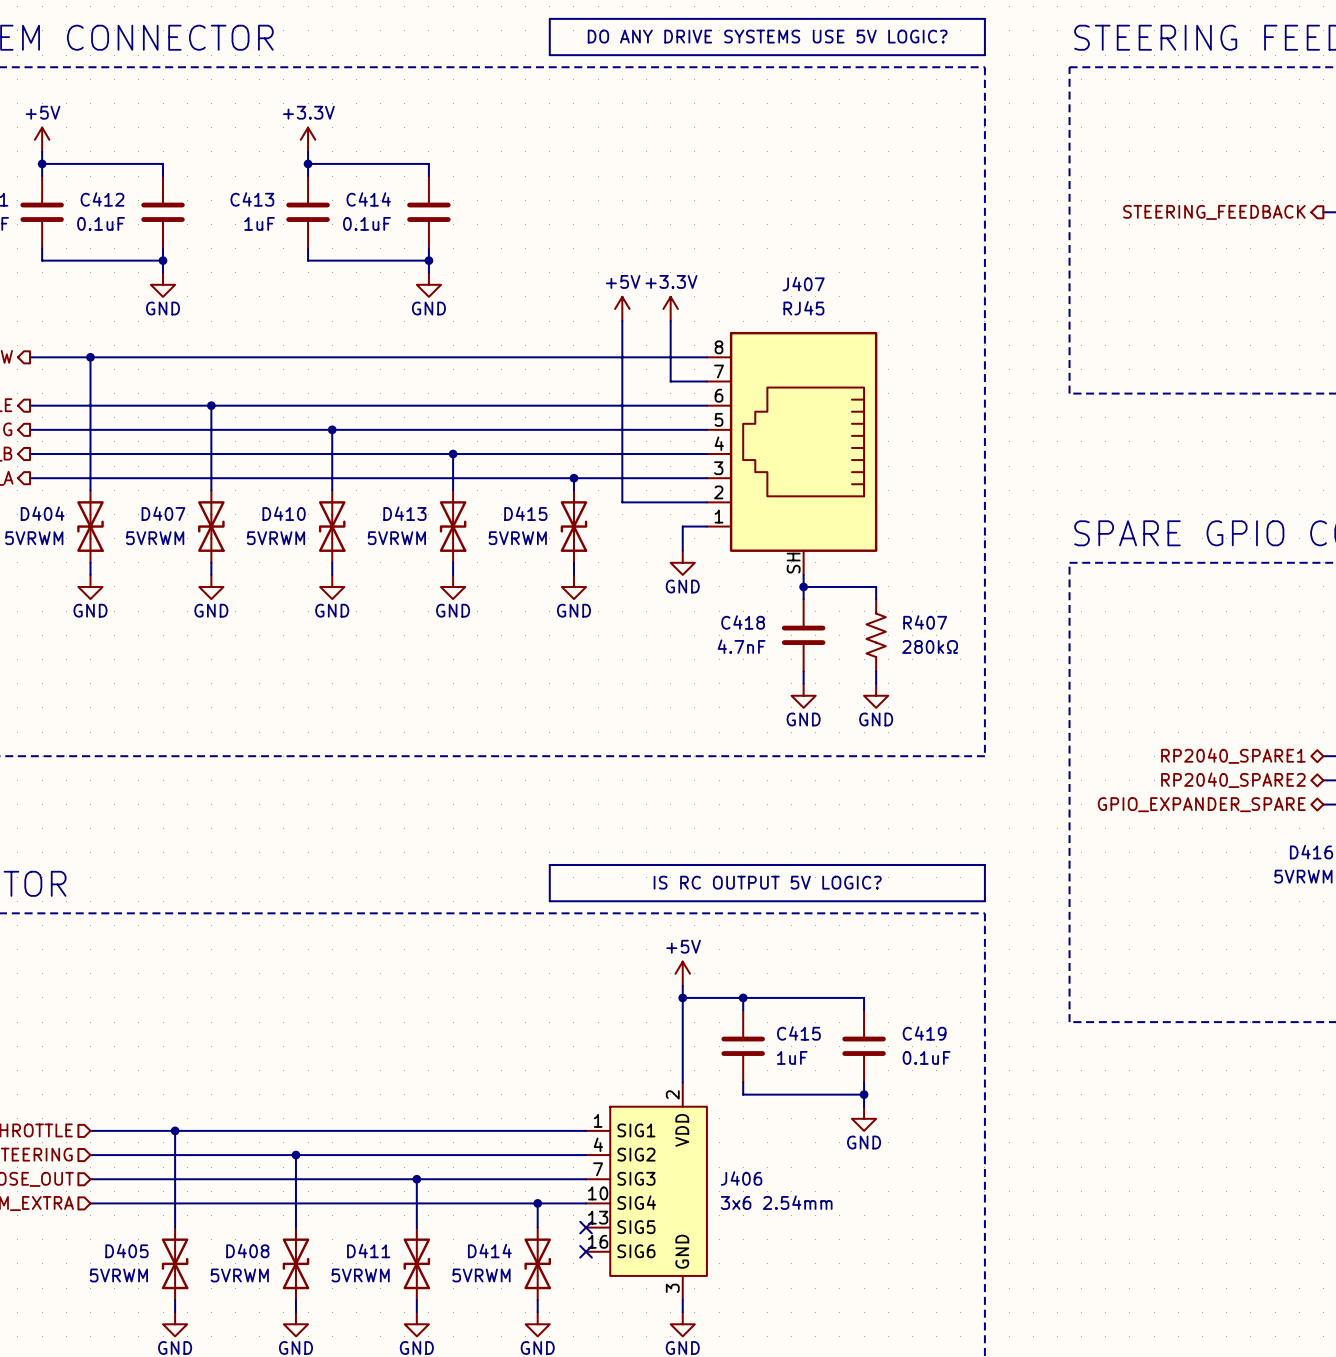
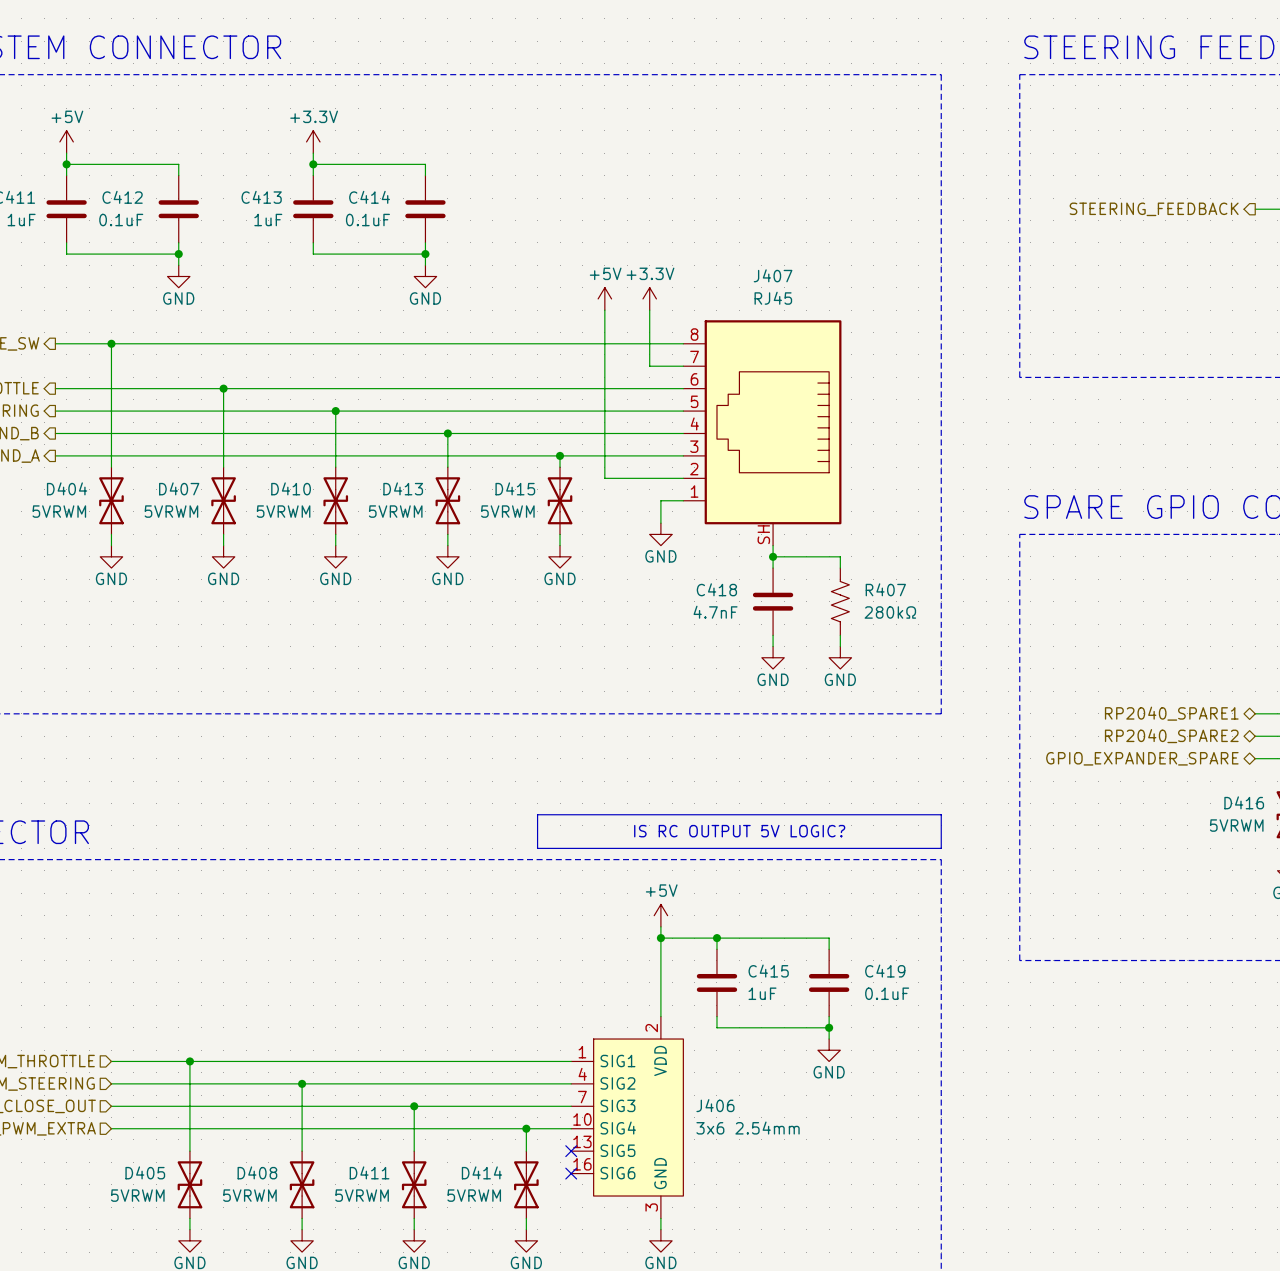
line: (549, 18) (984, 18) (984, 55) (549, 55) (549, 18) -> none
text: DO ANY DRIVE SYSTEMS USE 5V LOGIC? (767, 36) -> none

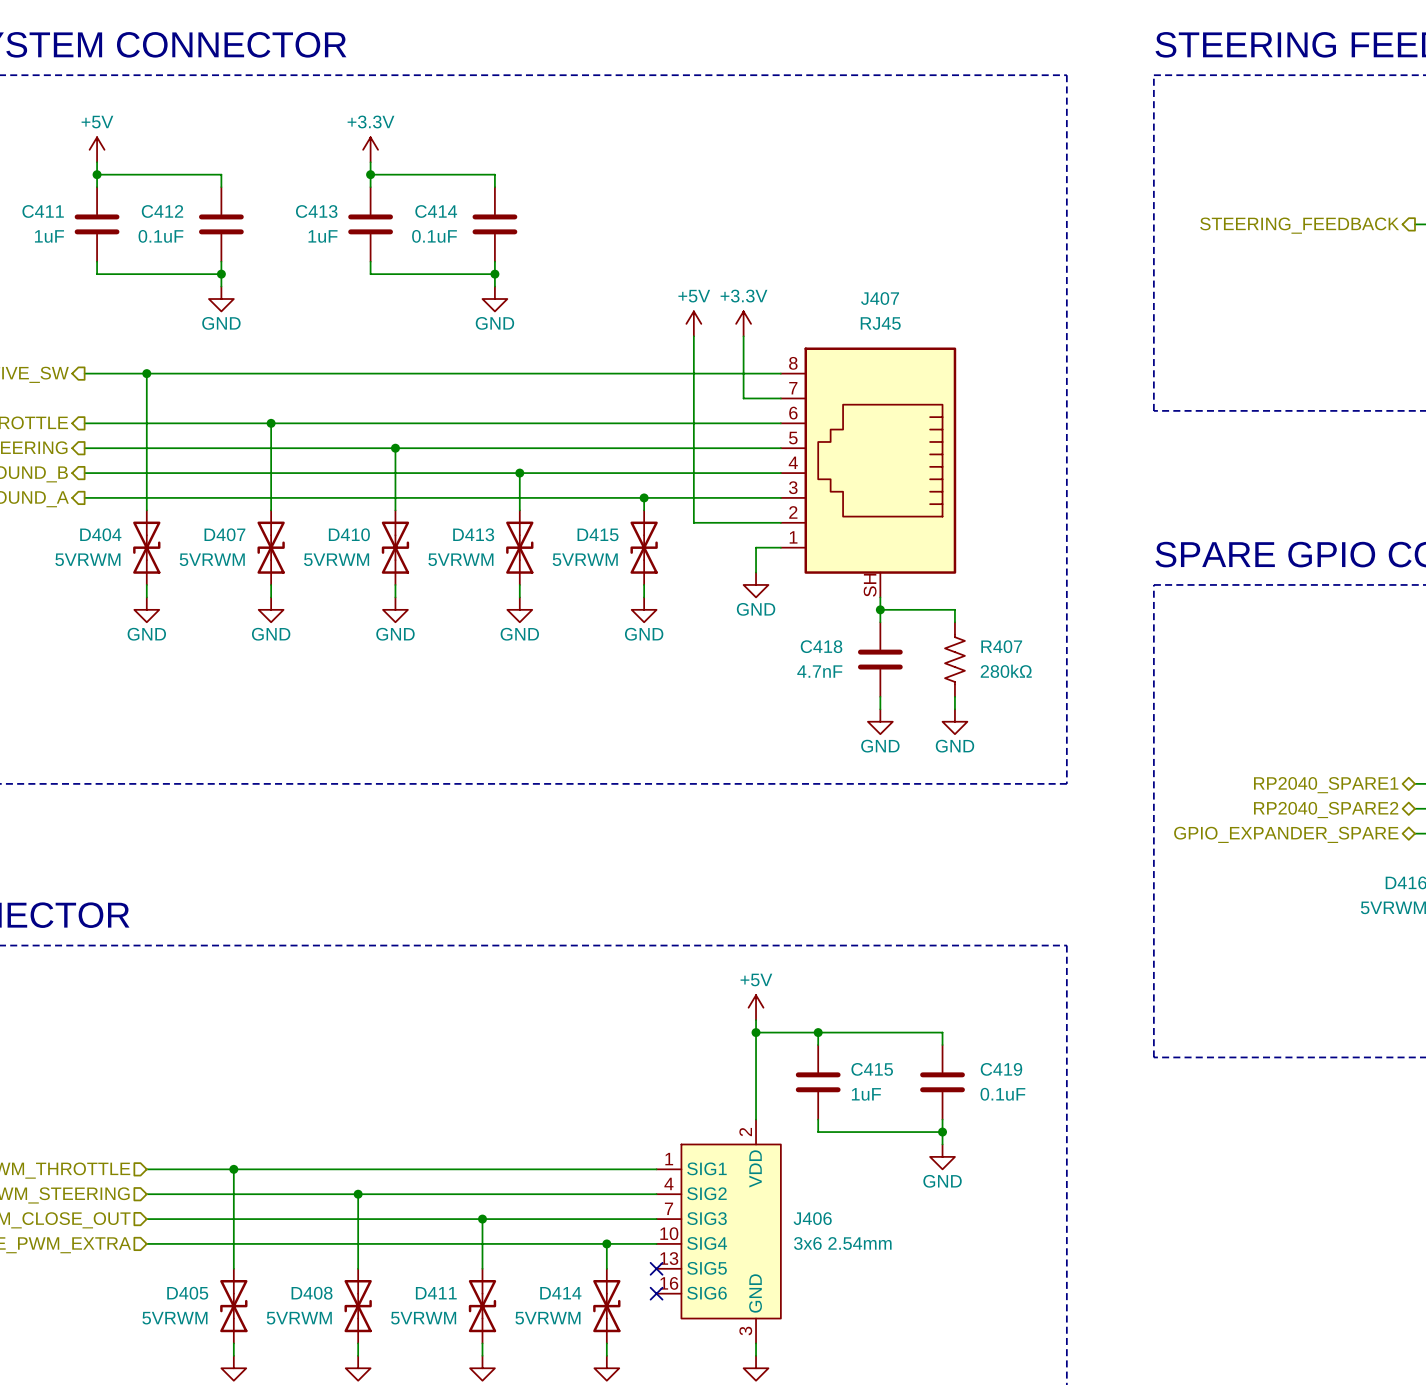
line: (537, 814) (941, 814) (941, 848) (537, 848) (537, 814) -> none
text: IS RC OUTPUT 5V LOGIC? (739, 831) -> none

